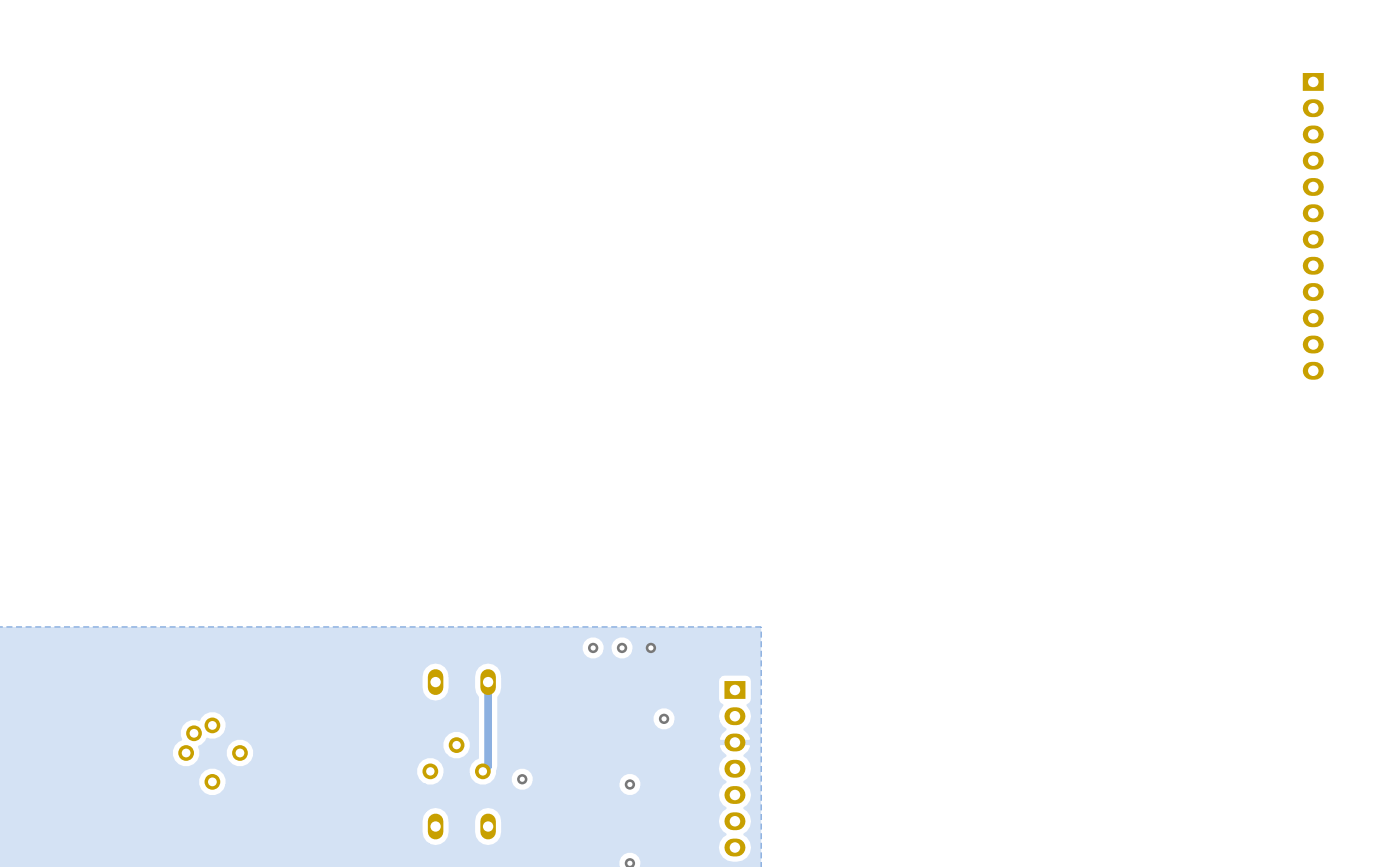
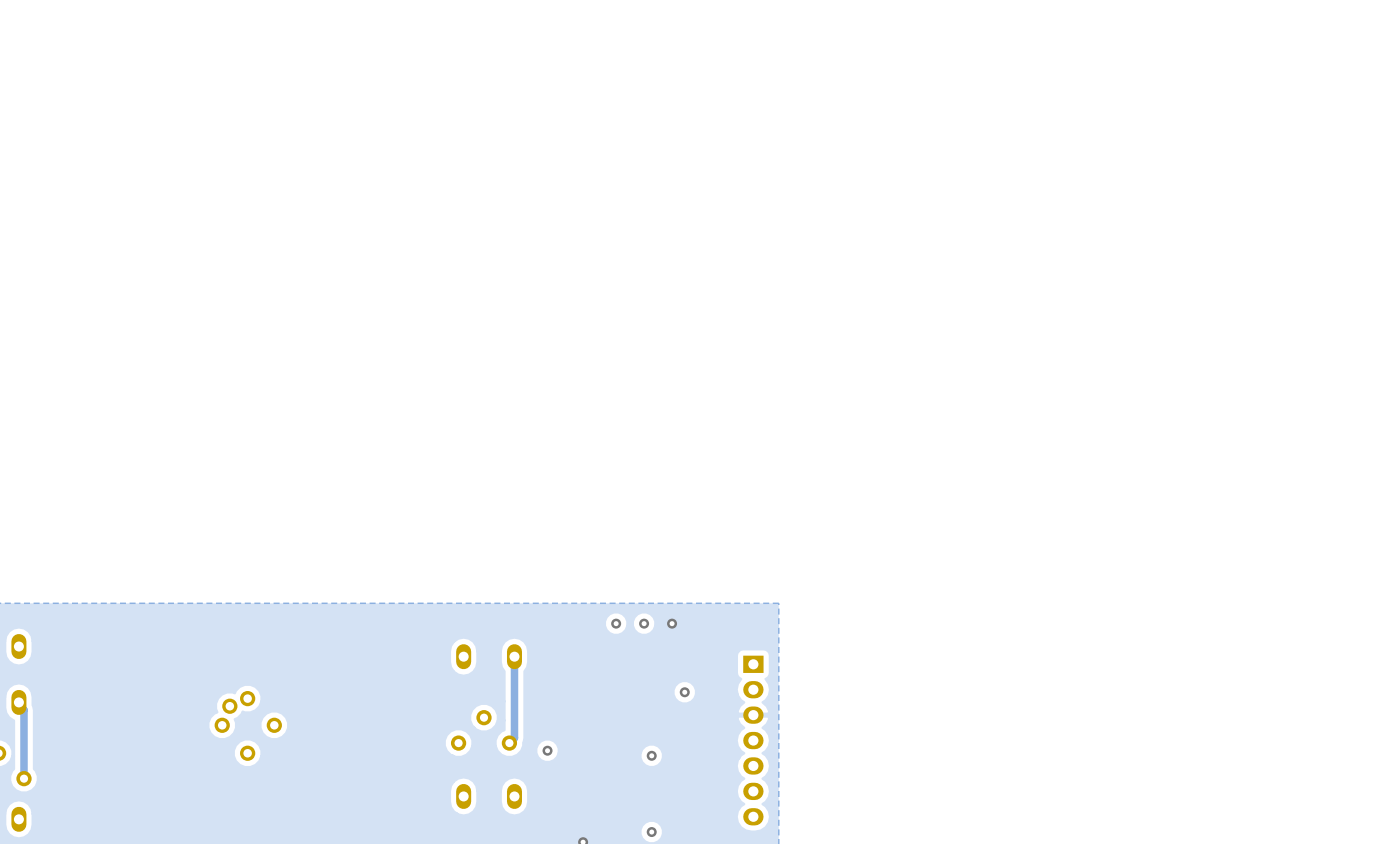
part: (1313, 226) -> none

